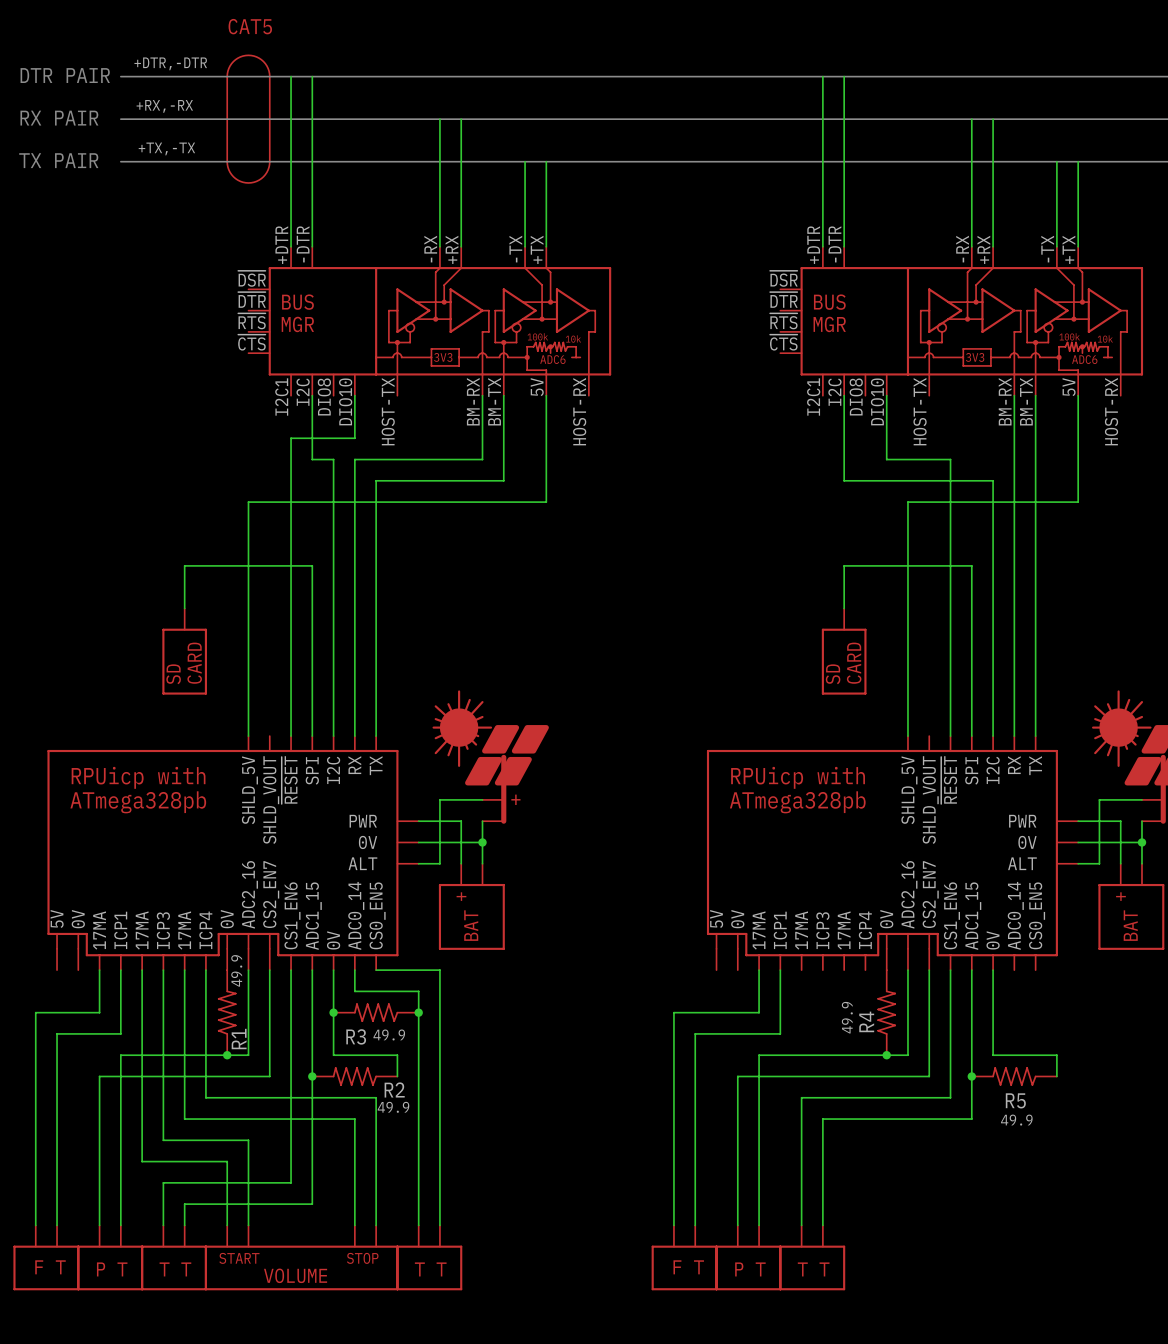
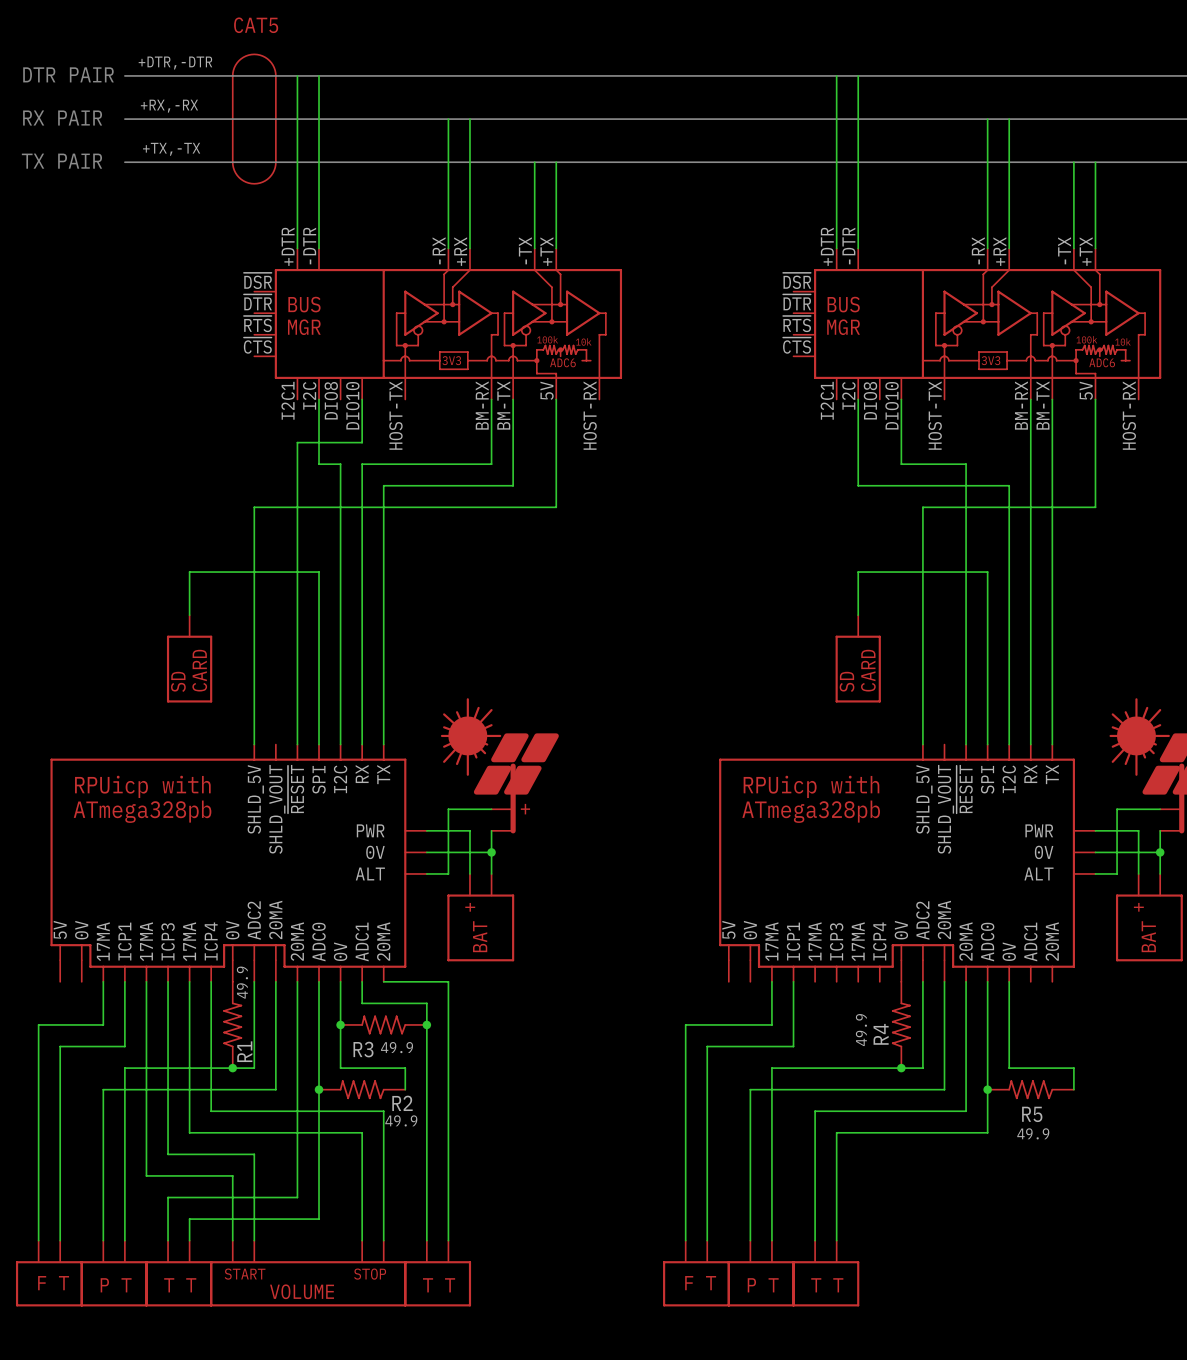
part pin name: ADC2_16 (249, 894) -> ADC2 (254, 920)
part pin name: CS2_EN7 (271, 894) -> 20MA (275, 919)
part pin name: ADC2_16 (909, 894) -> ADC2 (922, 920)
part pin name: CS2_EN7 (930, 894) -> 20MA (944, 919)
part pin name: CS1_EN6 (292, 915) -> 20MA (297, 941)
part pin name: ADC0_14 (356, 915) -> ADC1 (362, 941)
part pin name: CS0_EN5 (377, 915) -> 20MA (383, 941)
part pin name: CS1_EN6 (951, 915) -> 20MA (966, 941)
part pin name: ADC0_14 (1015, 915) -> ADC1 (1030, 941)
part pin name: CS0_EN5 (1037, 915) -> 20MA (1052, 941)
part pin name: ADC1_15 (313, 916) -> ADC0 (319, 942)
part pin name: ADC1_15 (973, 916) -> ADC0 (987, 942)

